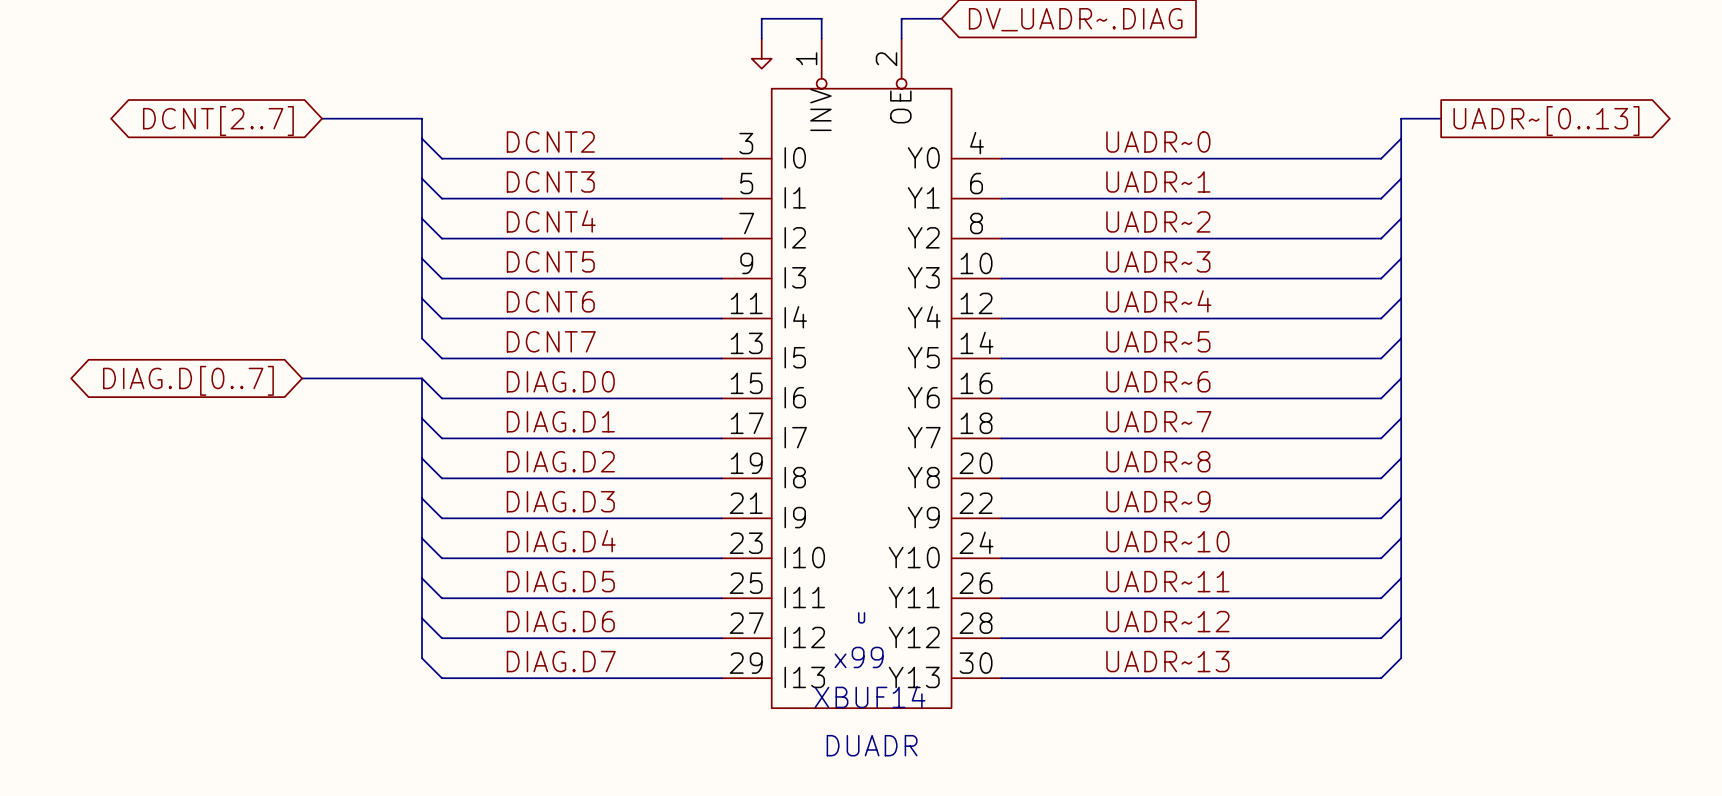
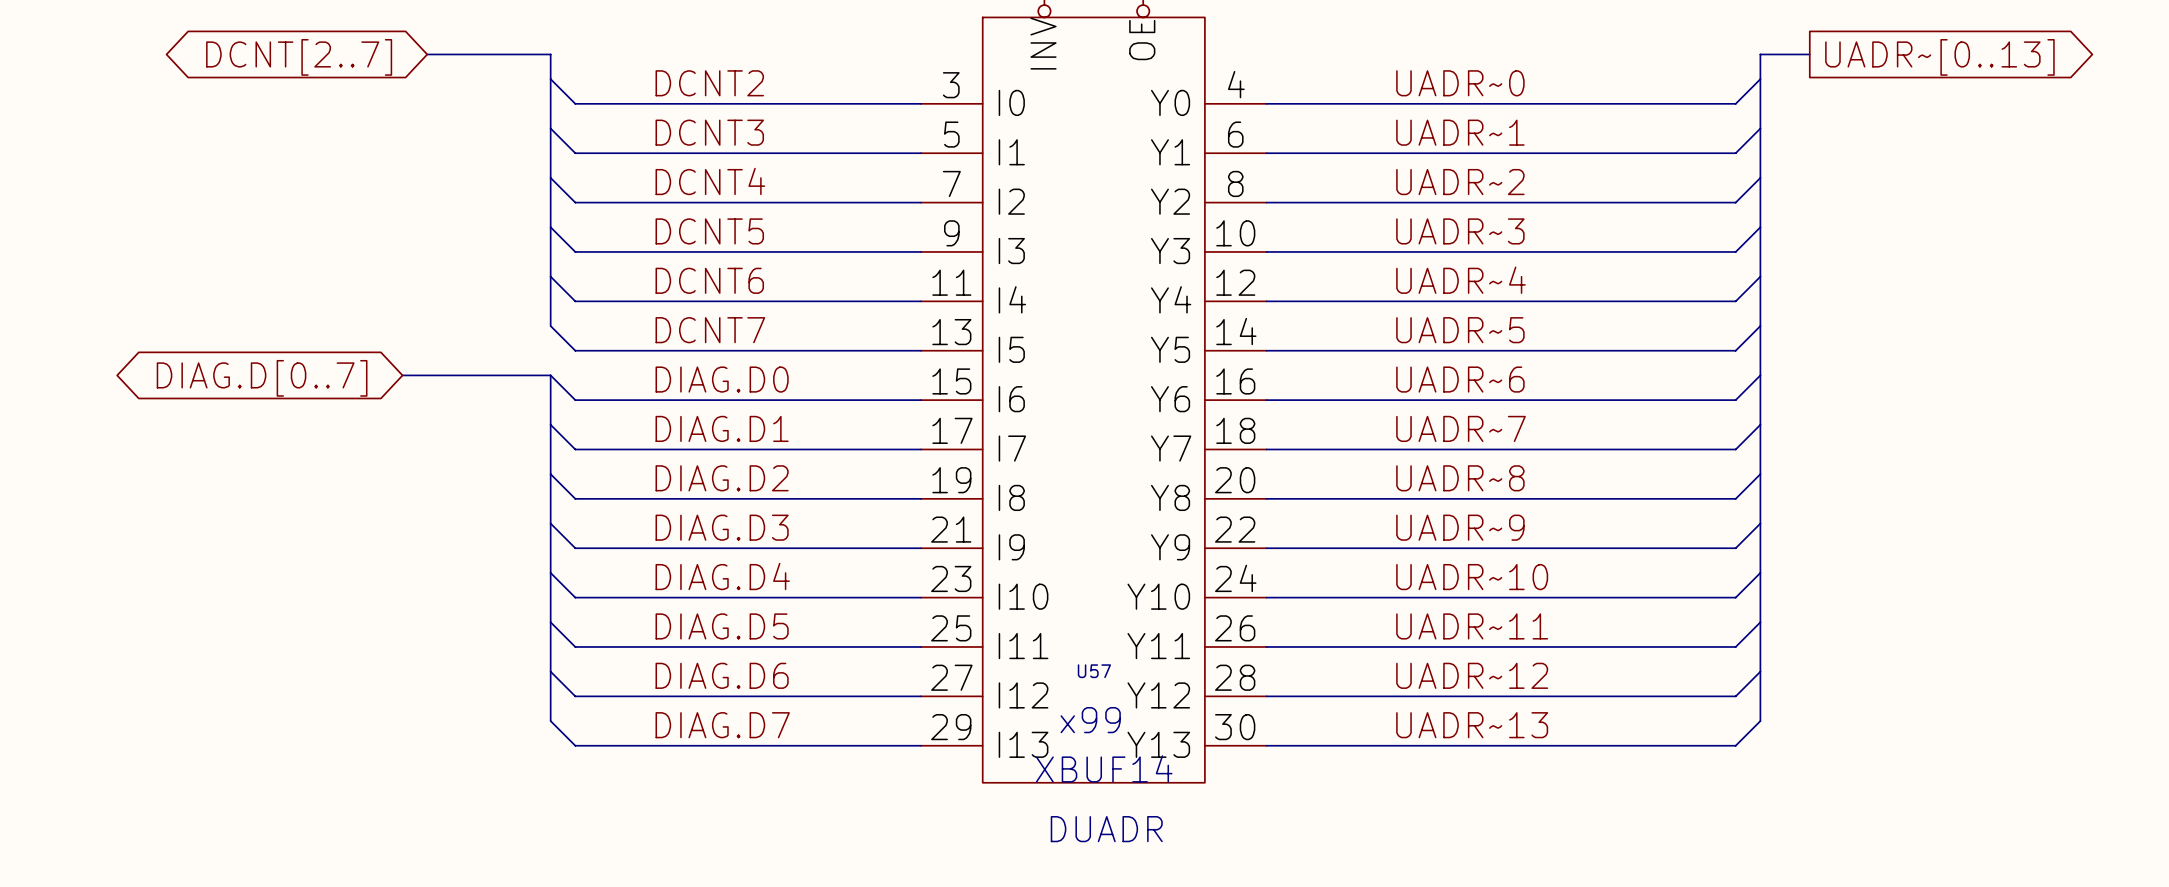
U name: U (861, 617) -> U57 (1094, 671)

